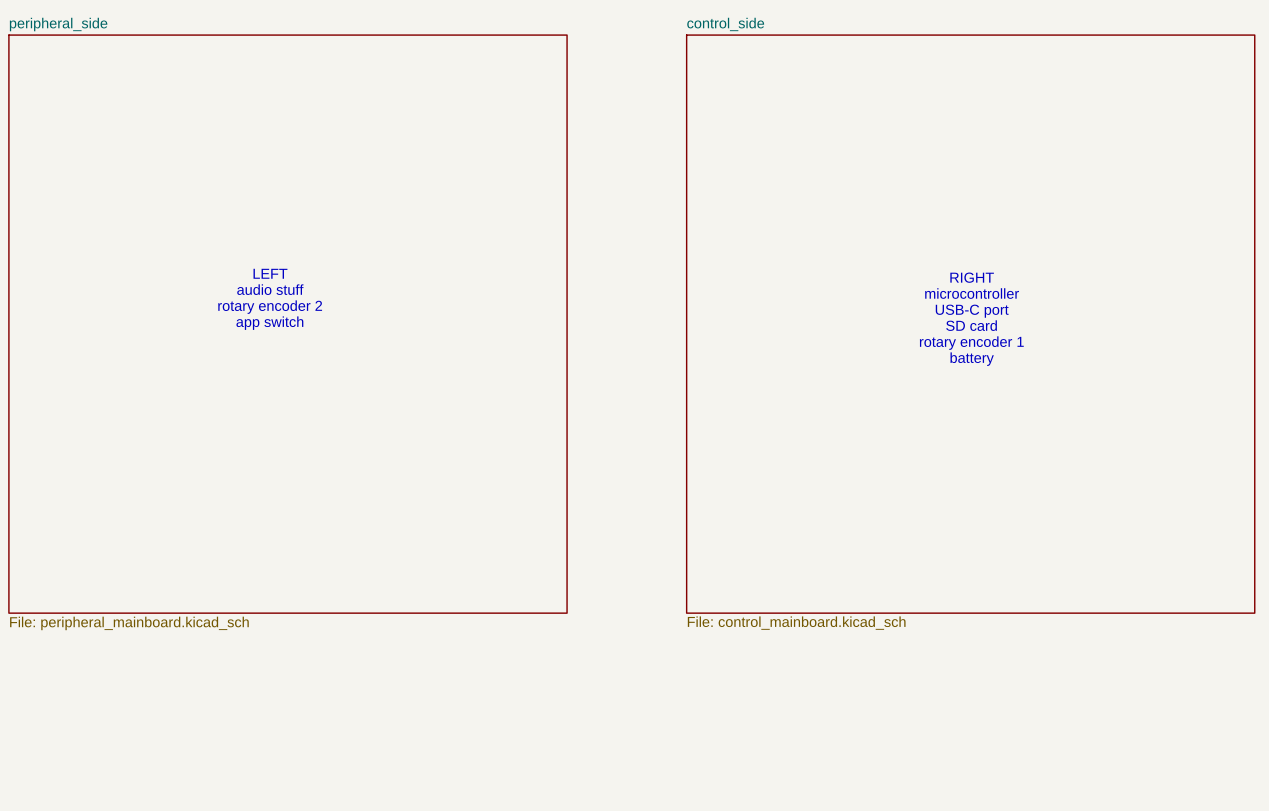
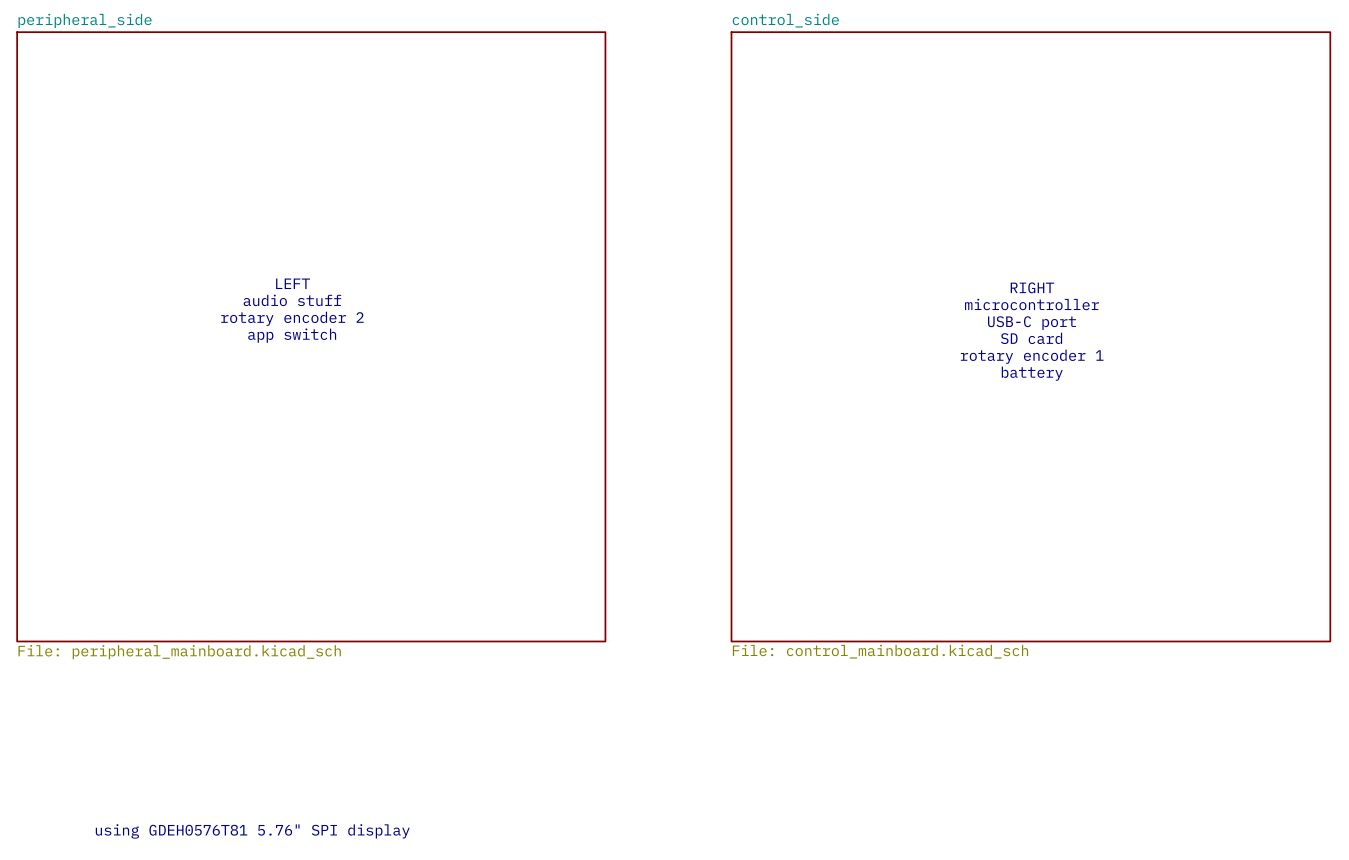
text: none -> using GDEH0576T81 5.76" SPI display (252, 831)

